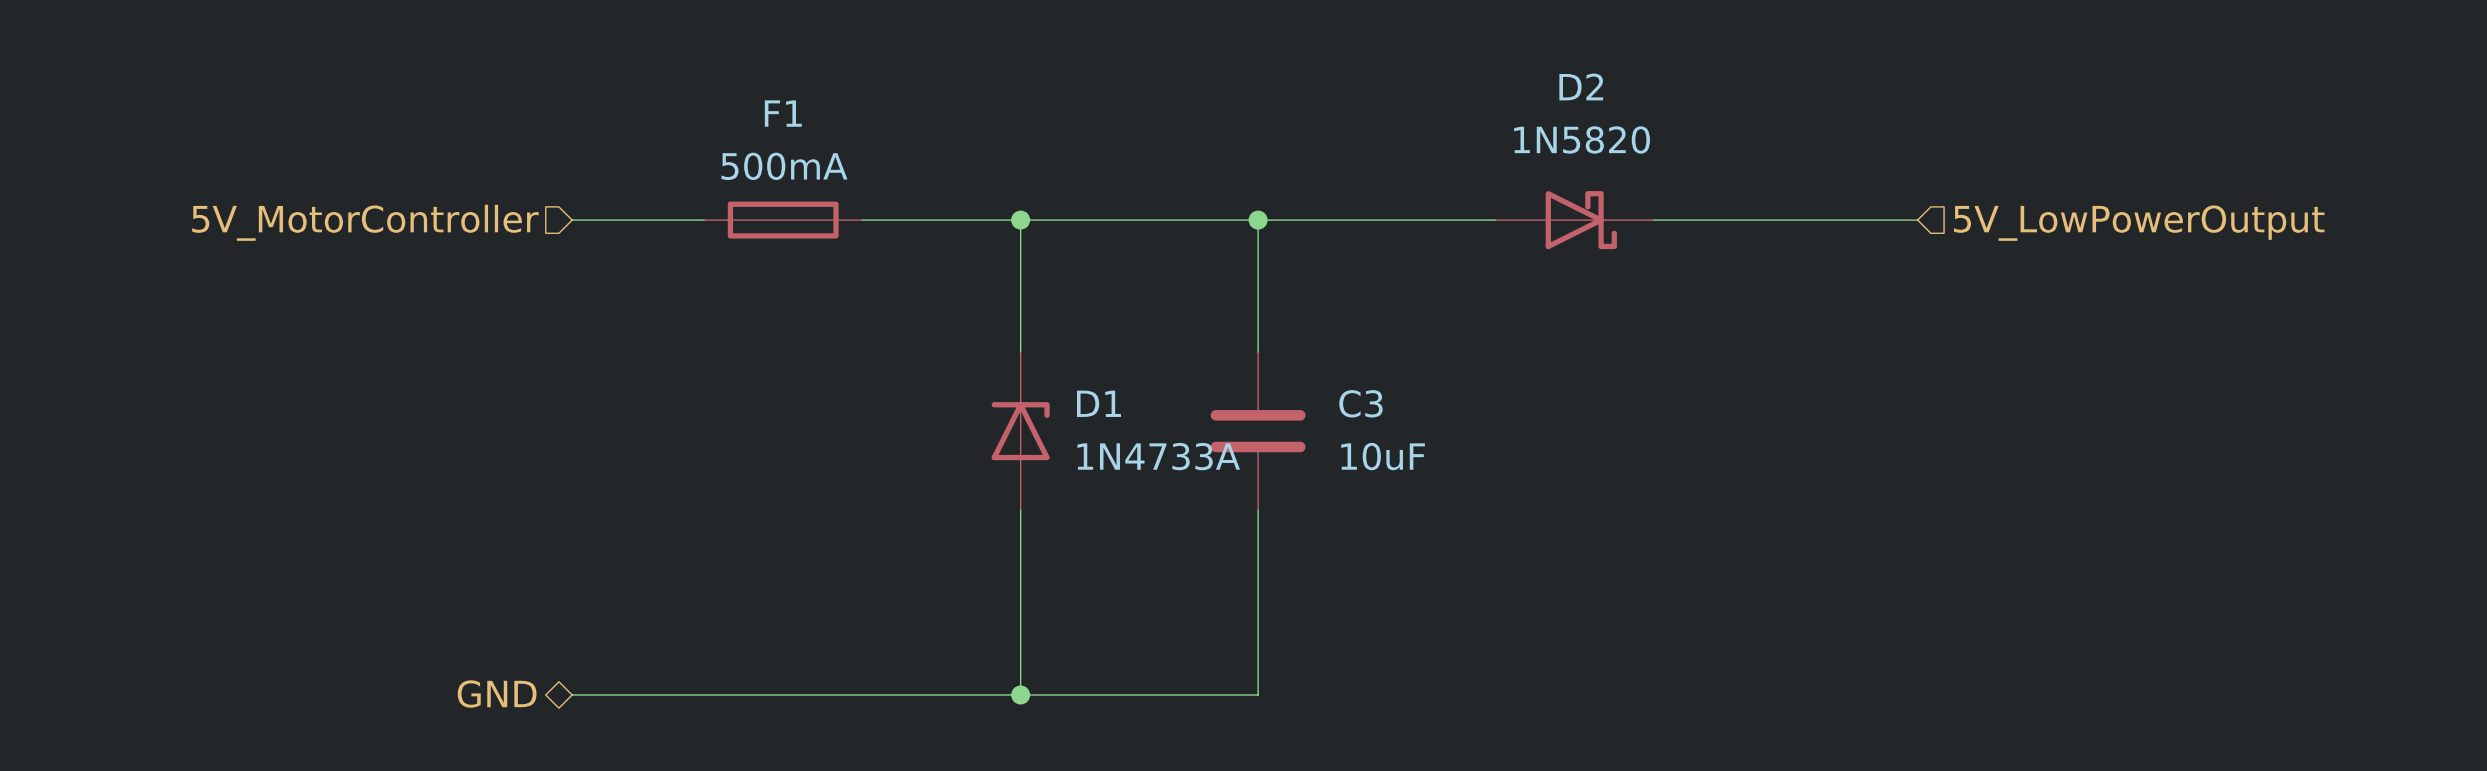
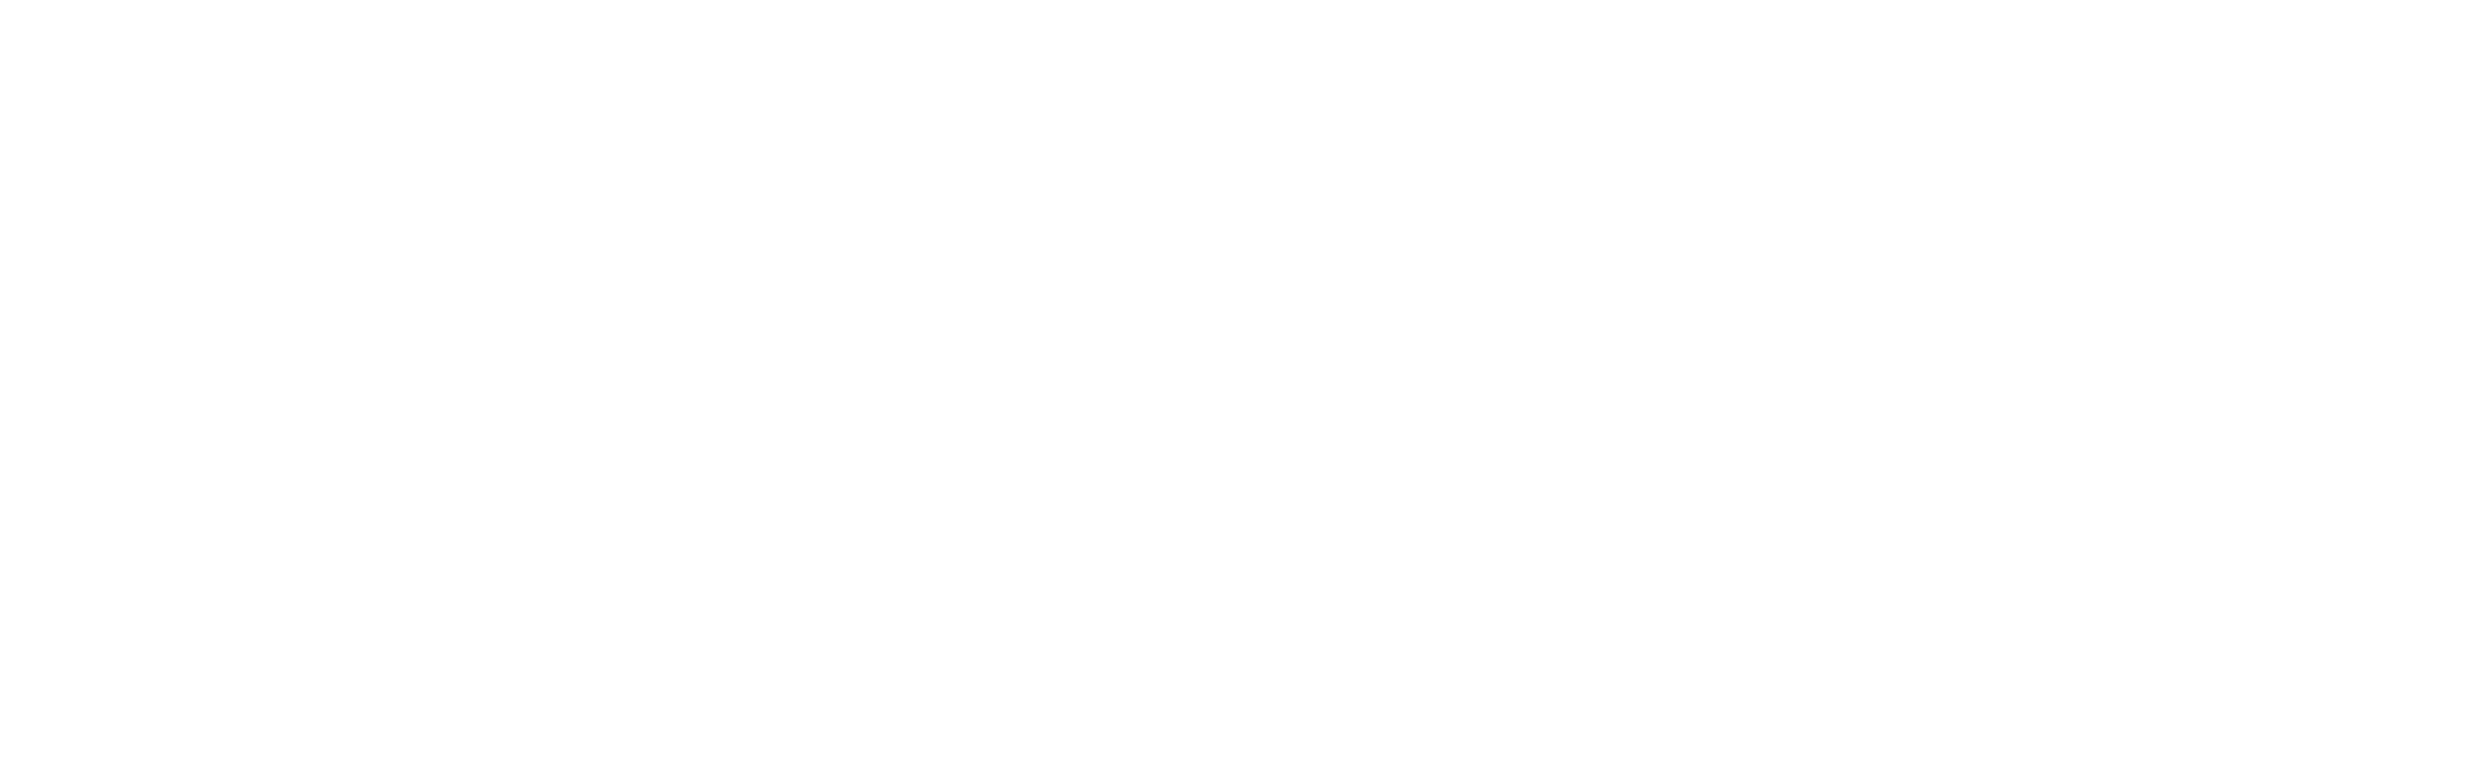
wire: (572, 220) (704, 220) -> none
F1: 500mA (783, 220) -> none
wire: (862, 220) (1495, 220) -> none
wire: (1020, 220) (1020, 352) -> none
junction: (1020, 220) -> none
wire: (1258, 220) (1258, 352) -> none
junction: (1258, 220) -> none
D2: 1N5820 (1574, 220) -> none
wire: (1653, 220) (1917, 220) -> none
hierarchical label: 5V_MotorController (365, 222) -> none
hierarchical label: 5V_LowPowerOutput (2139, 223) -> none
D1: 1N4733A (1020, 431) -> none
C3: 10uF (1258, 431) -> none
wire: (1020, 510) (1020, 694) -> none
wire: (1258, 510) (1258, 694) (572, 694) -> none
hierarchical label: GND (497, 694) -> none
junction: (1020, 694) -> none

